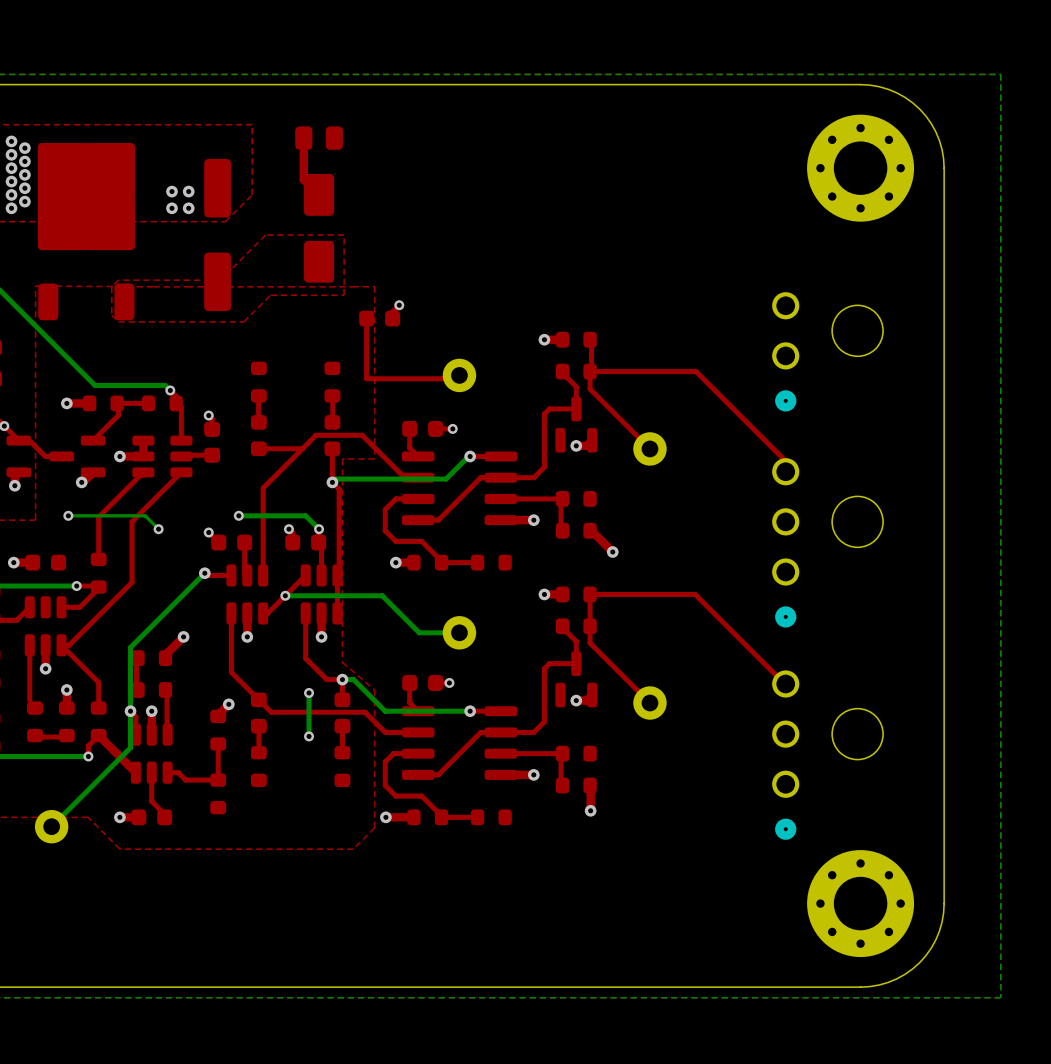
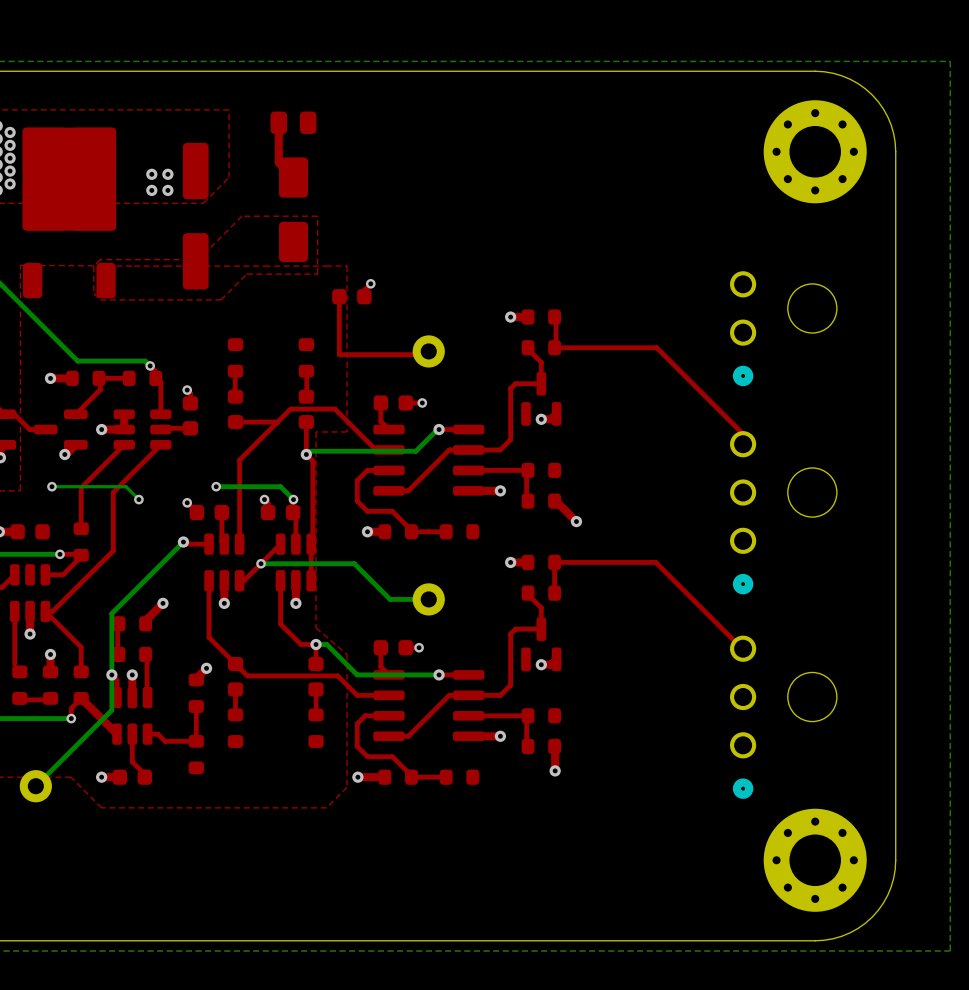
top track: (590, 371) (590, 389) (649, 448) -> none
part: (649, 448) -> none
top track: (590, 626) (590, 643) (649, 703) -> none
bottom track: (309, 692) (309, 736) -> none
via: (309, 692) -> none
part: (649, 703) -> none
via: (309, 736) -> none

